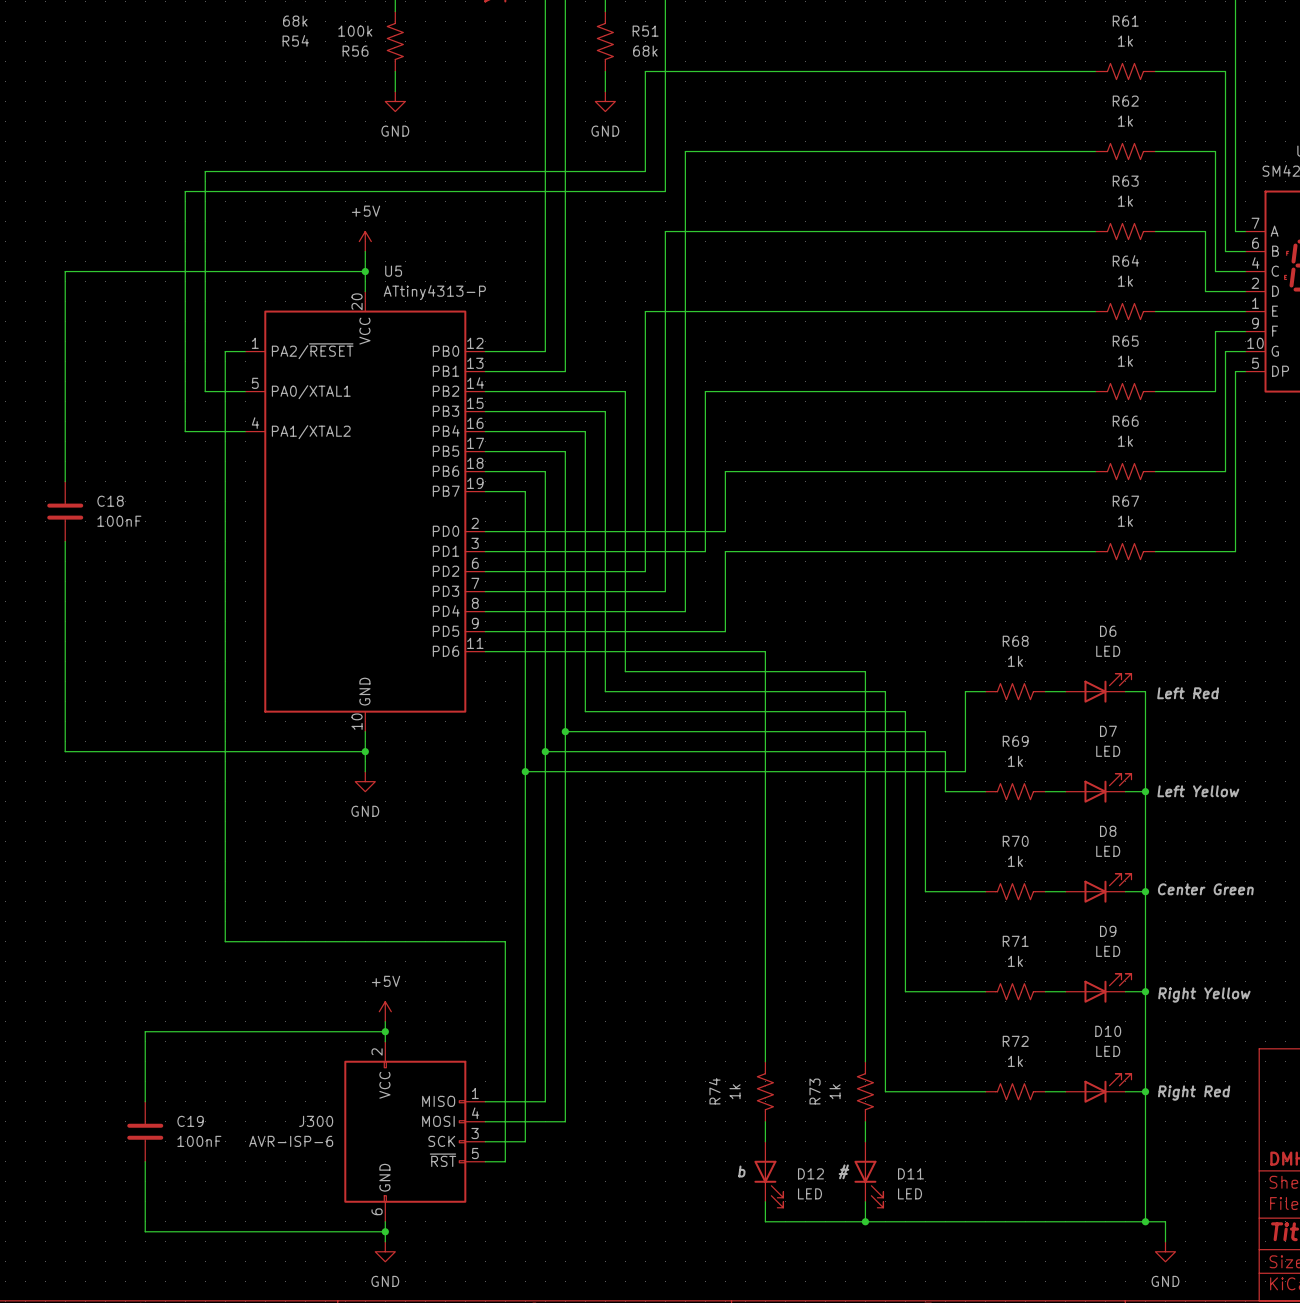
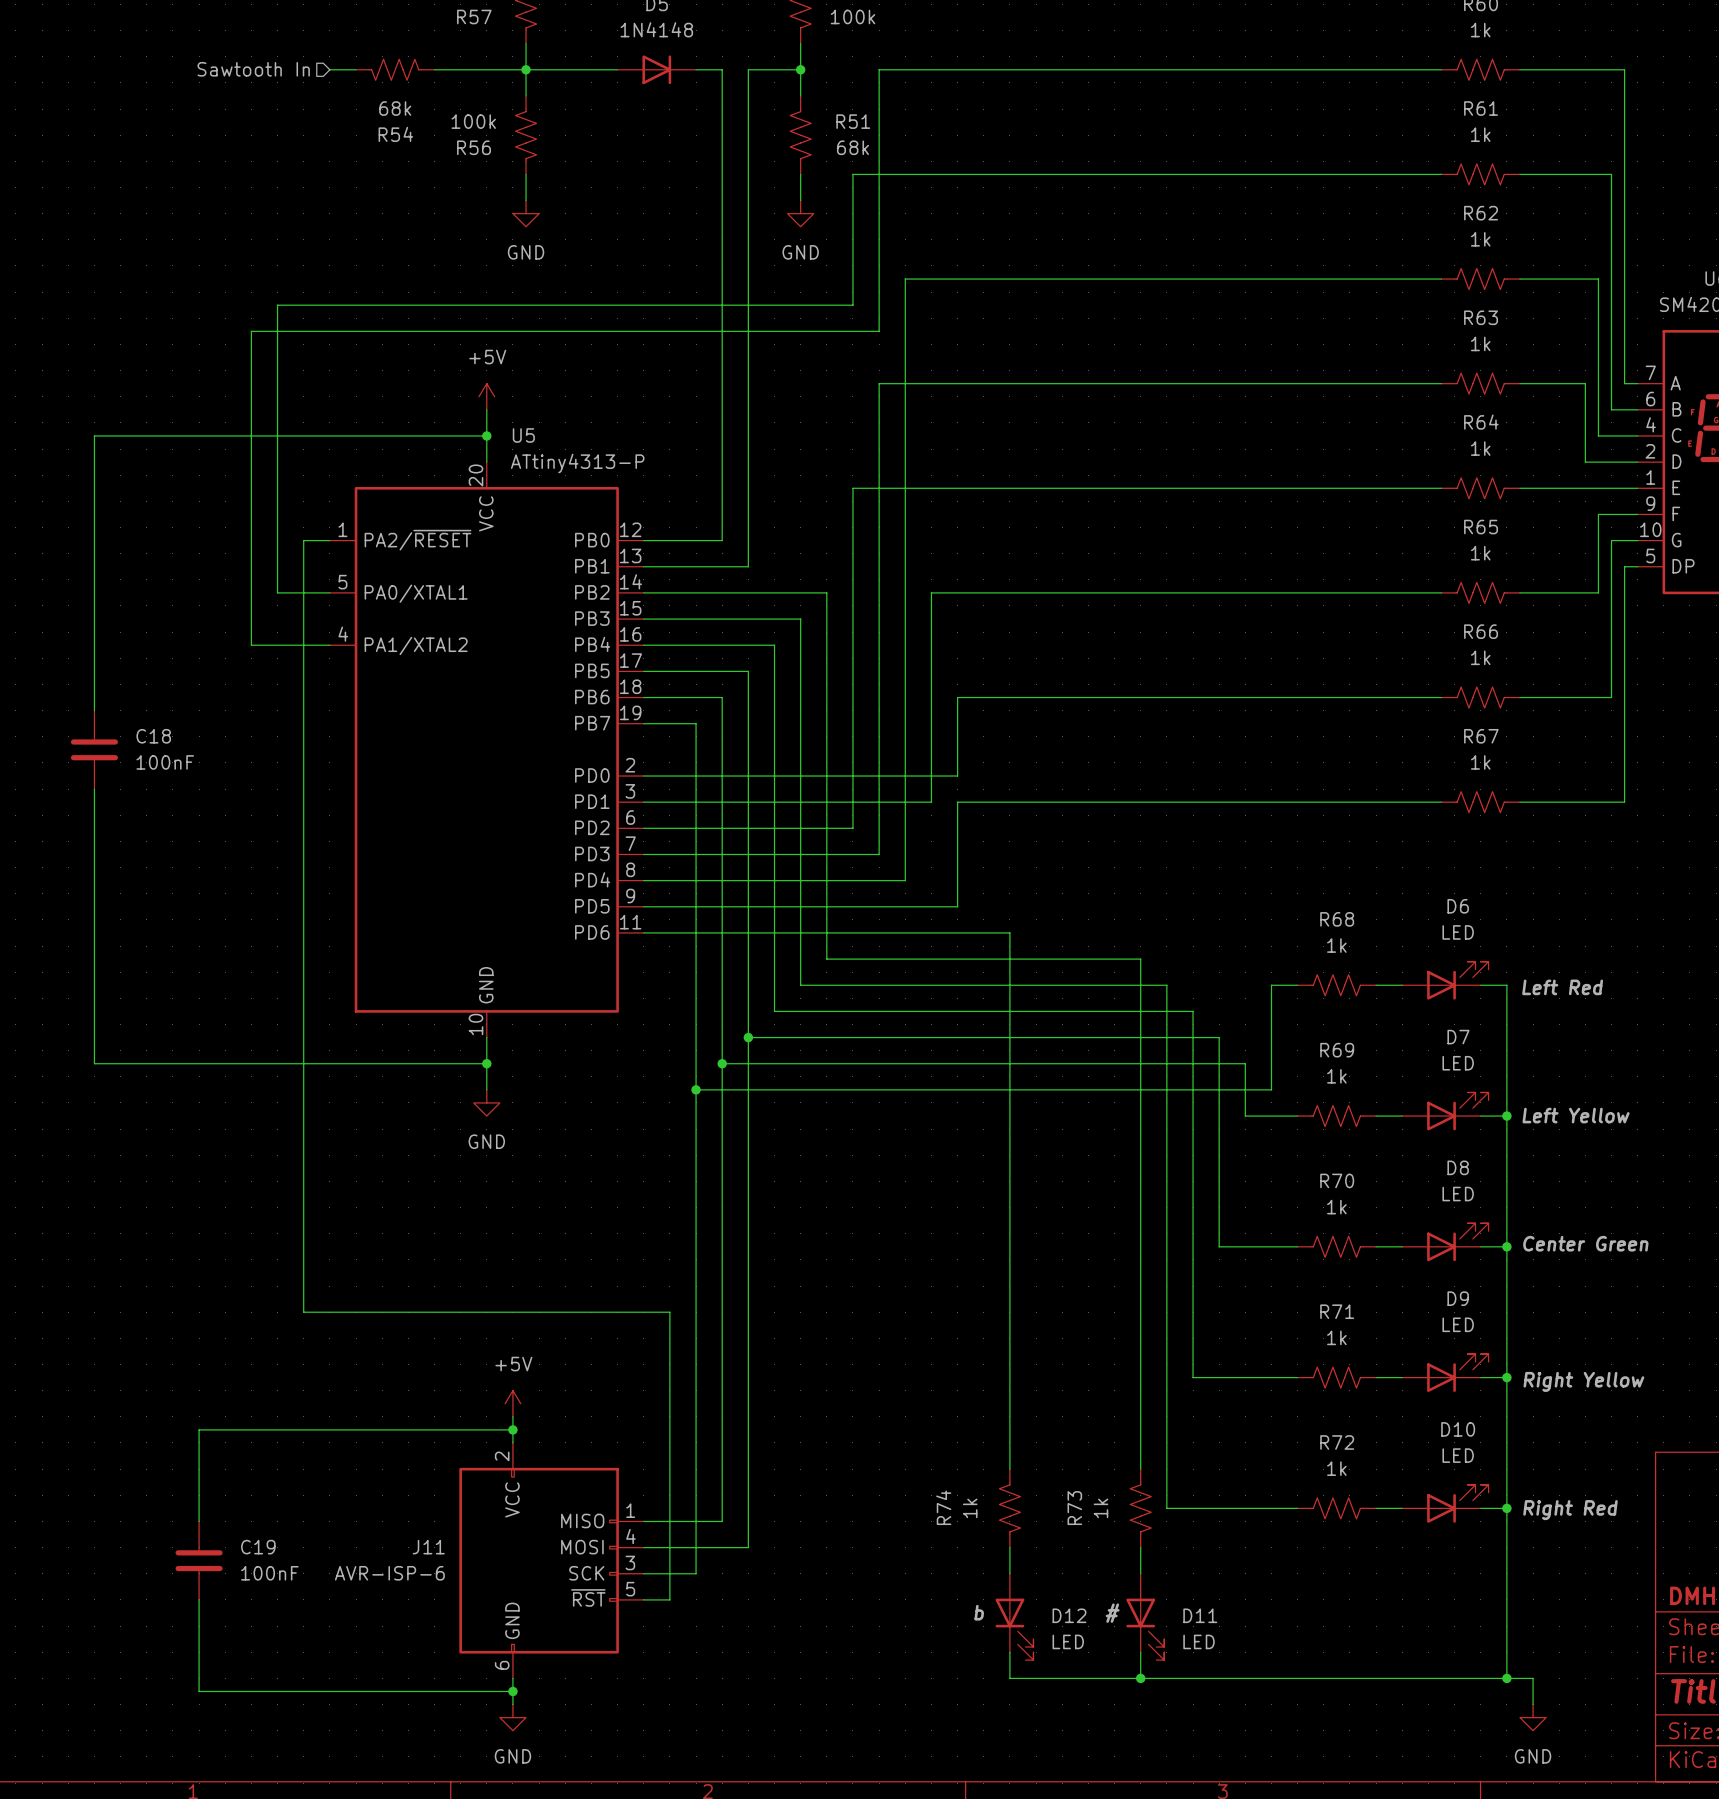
J300 name: J300 (316, 1121) -> J11 (428, 1547)

